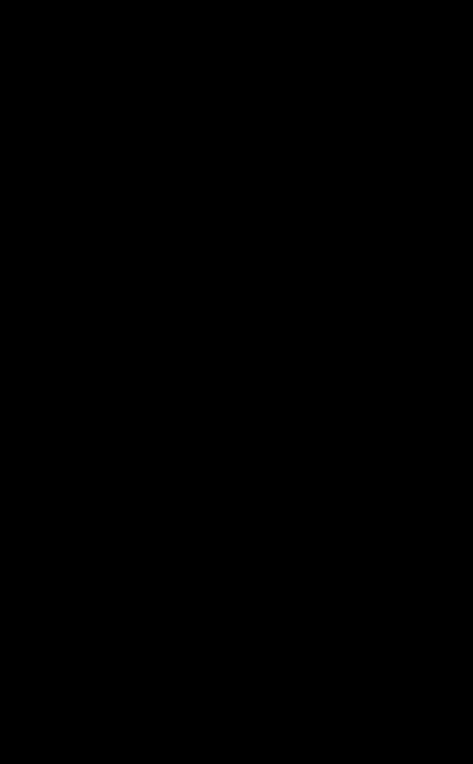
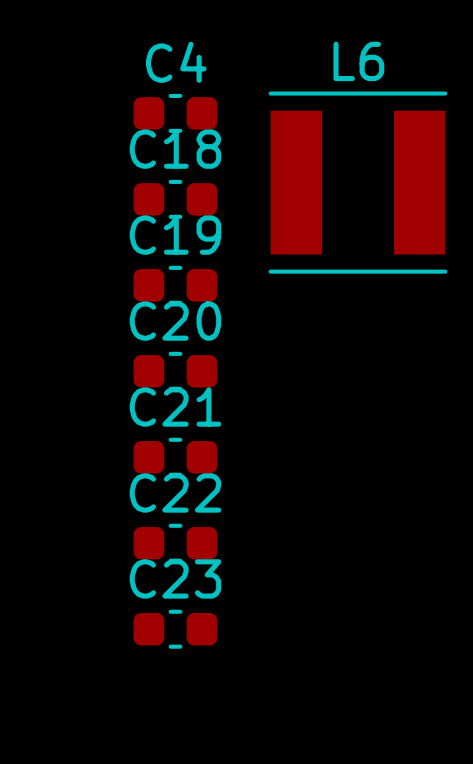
C4: none -> (175, 113)
L6: none -> (358, 182)
C18: none -> (175, 199)
C19: none -> (175, 285)
C20: none -> (175, 371)
C21: none -> (175, 457)
C22: none -> (175, 543)
C23: none -> (175, 629)

